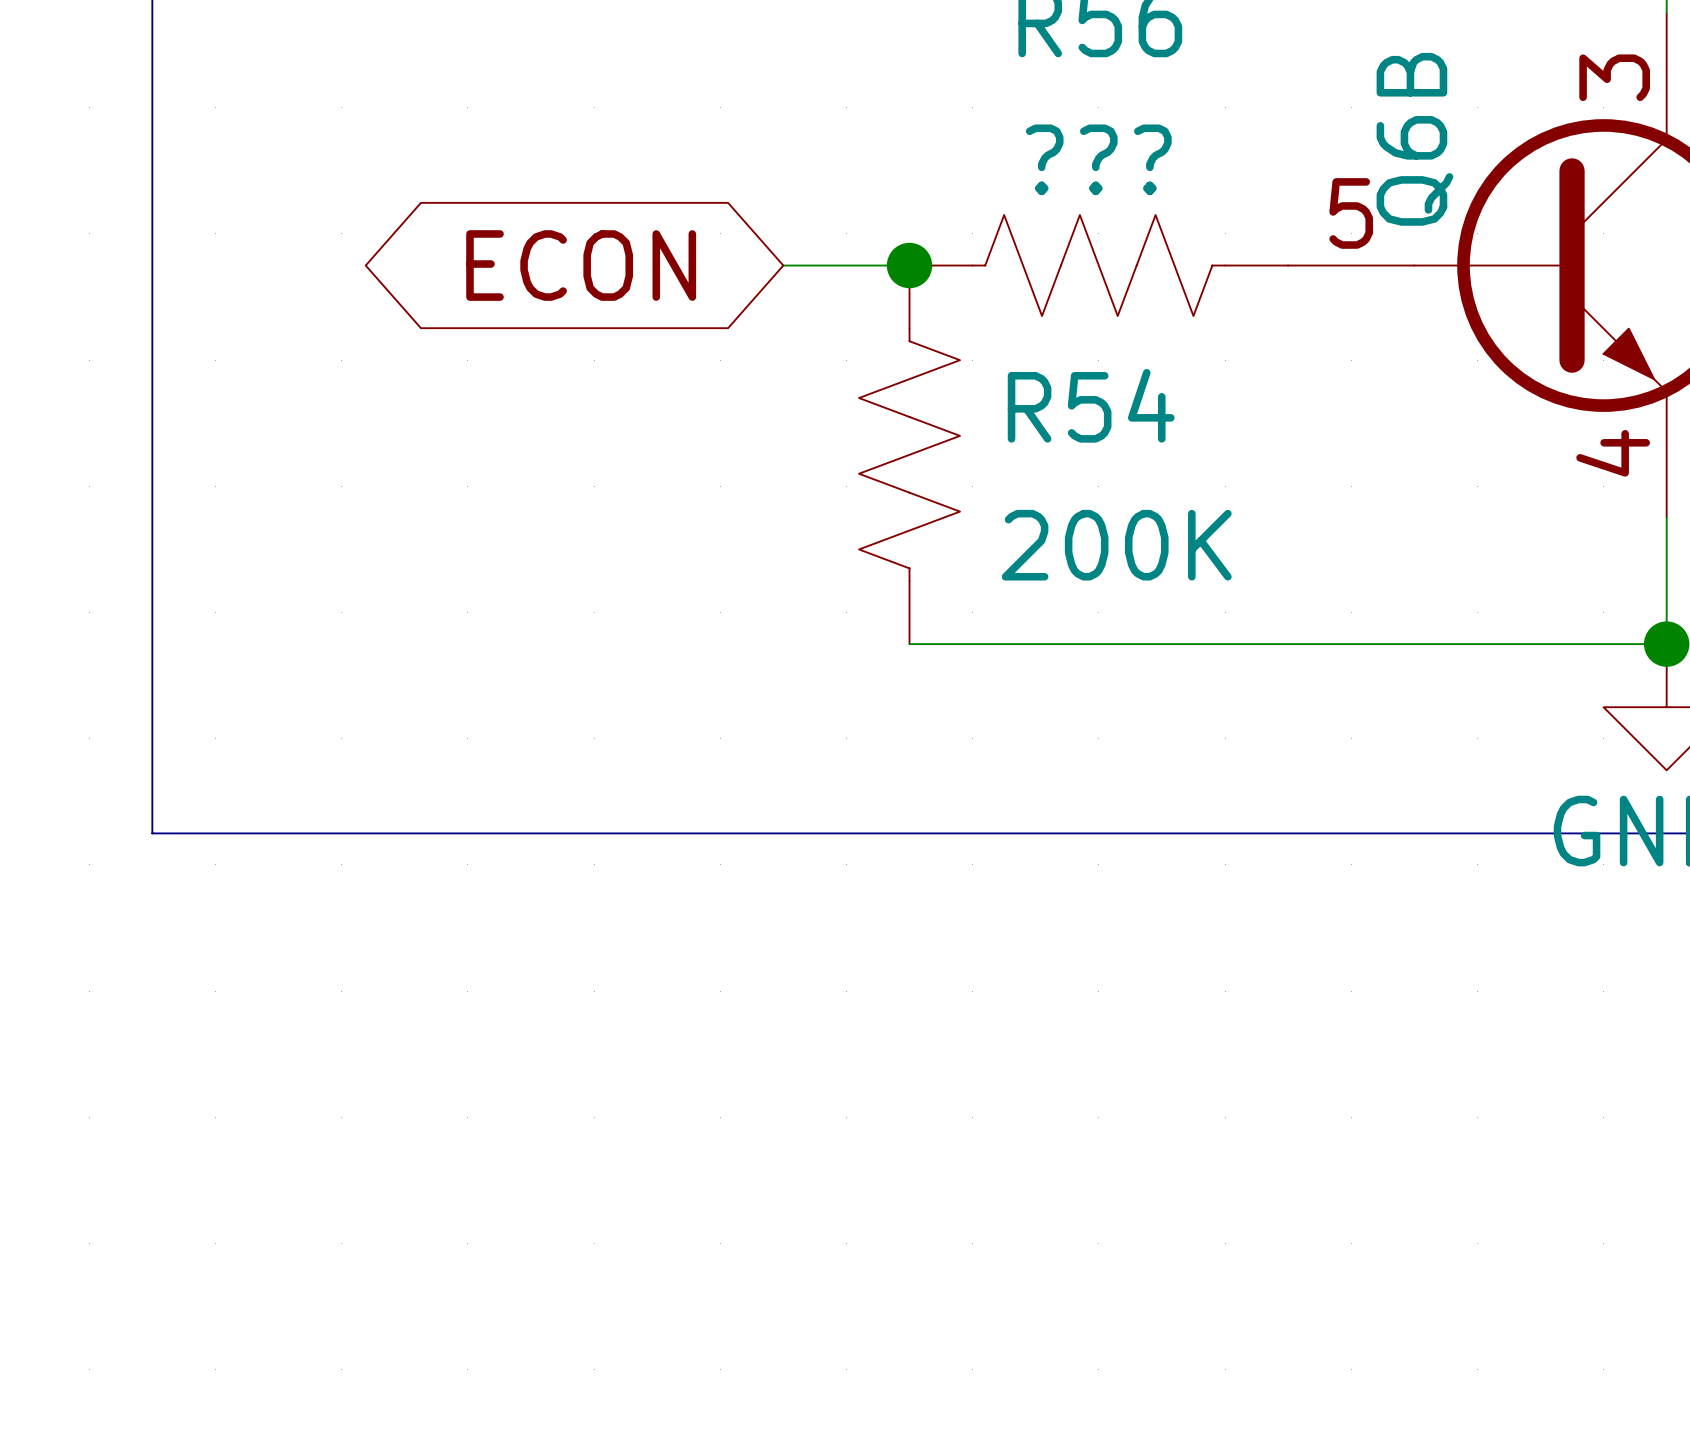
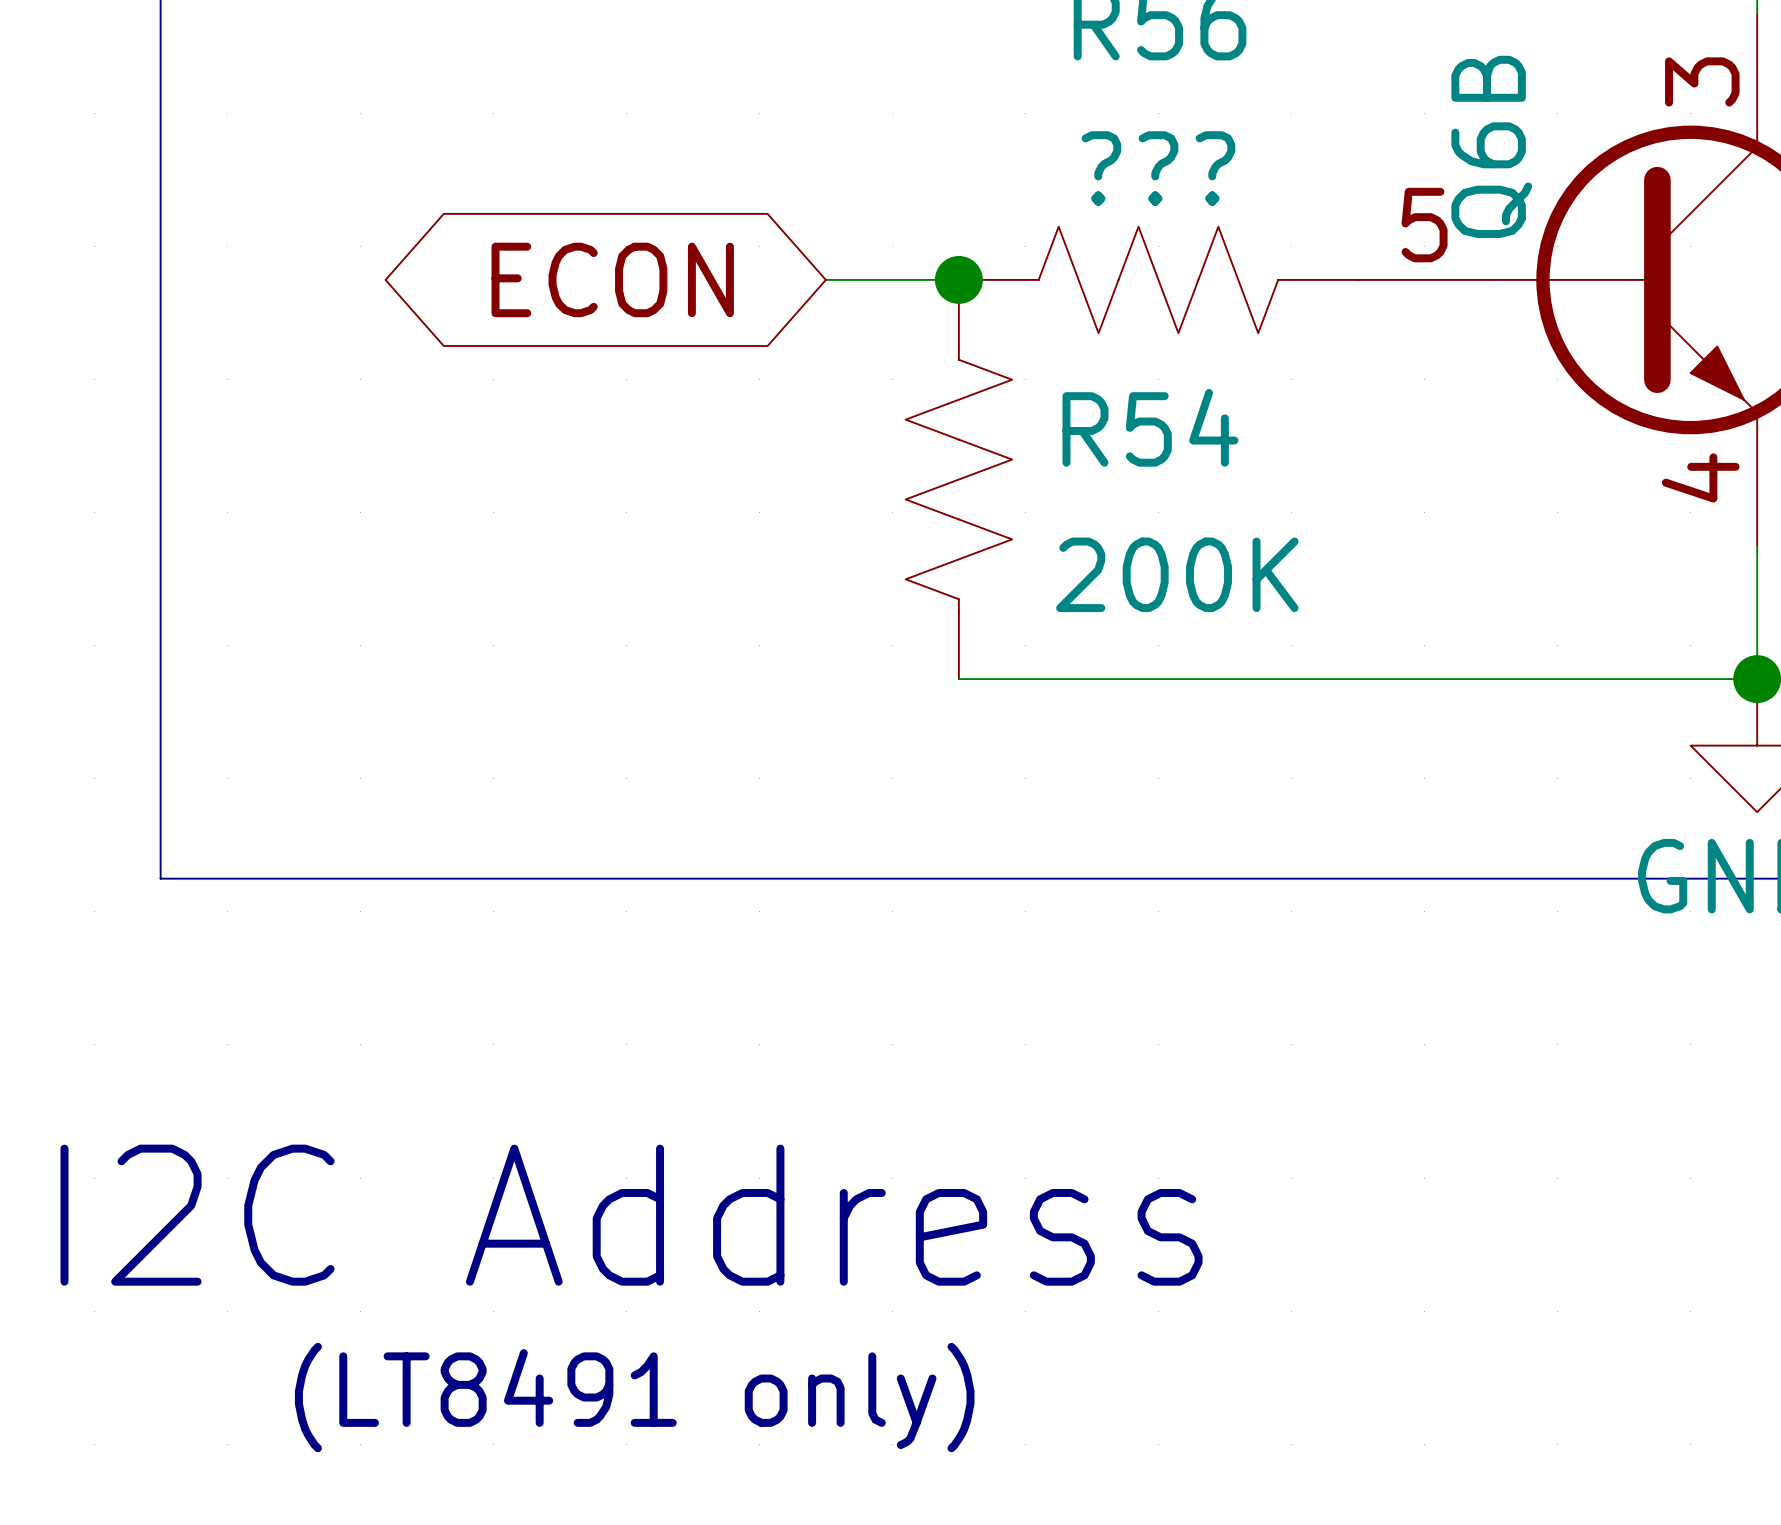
text: none -> I2C Address (631, 1215)
text: none -> (LT8491 only) (634, 1397)

